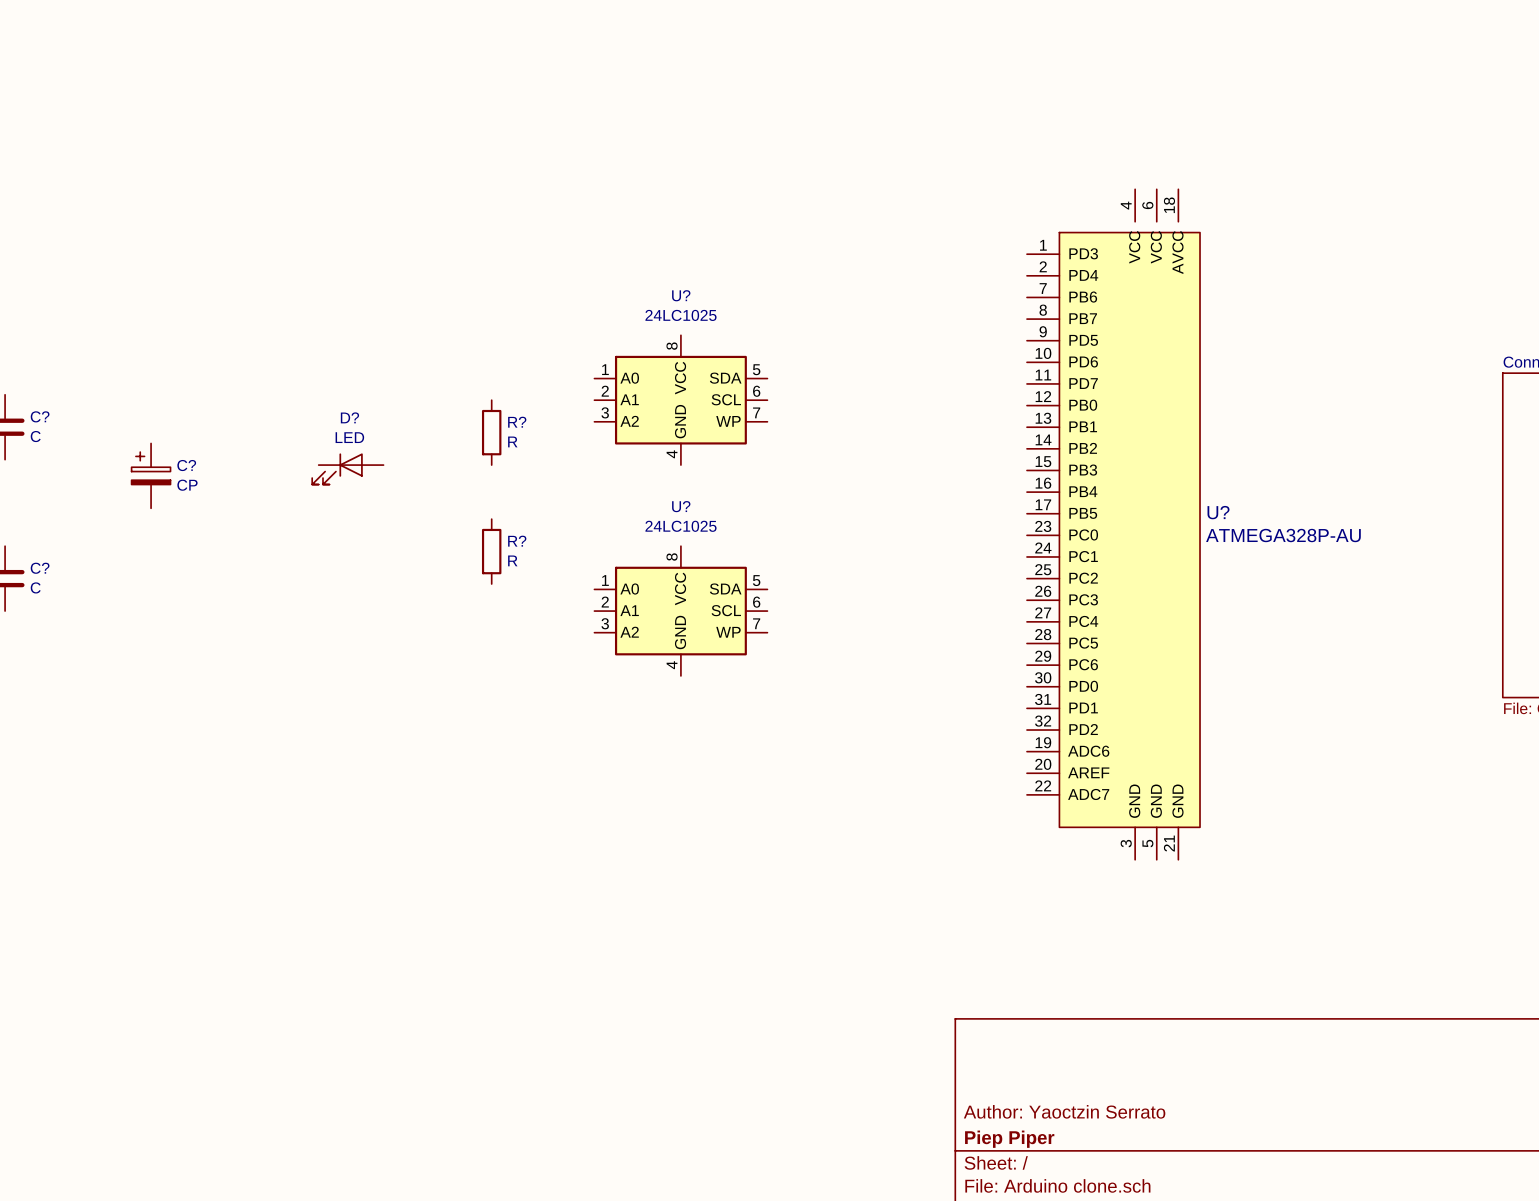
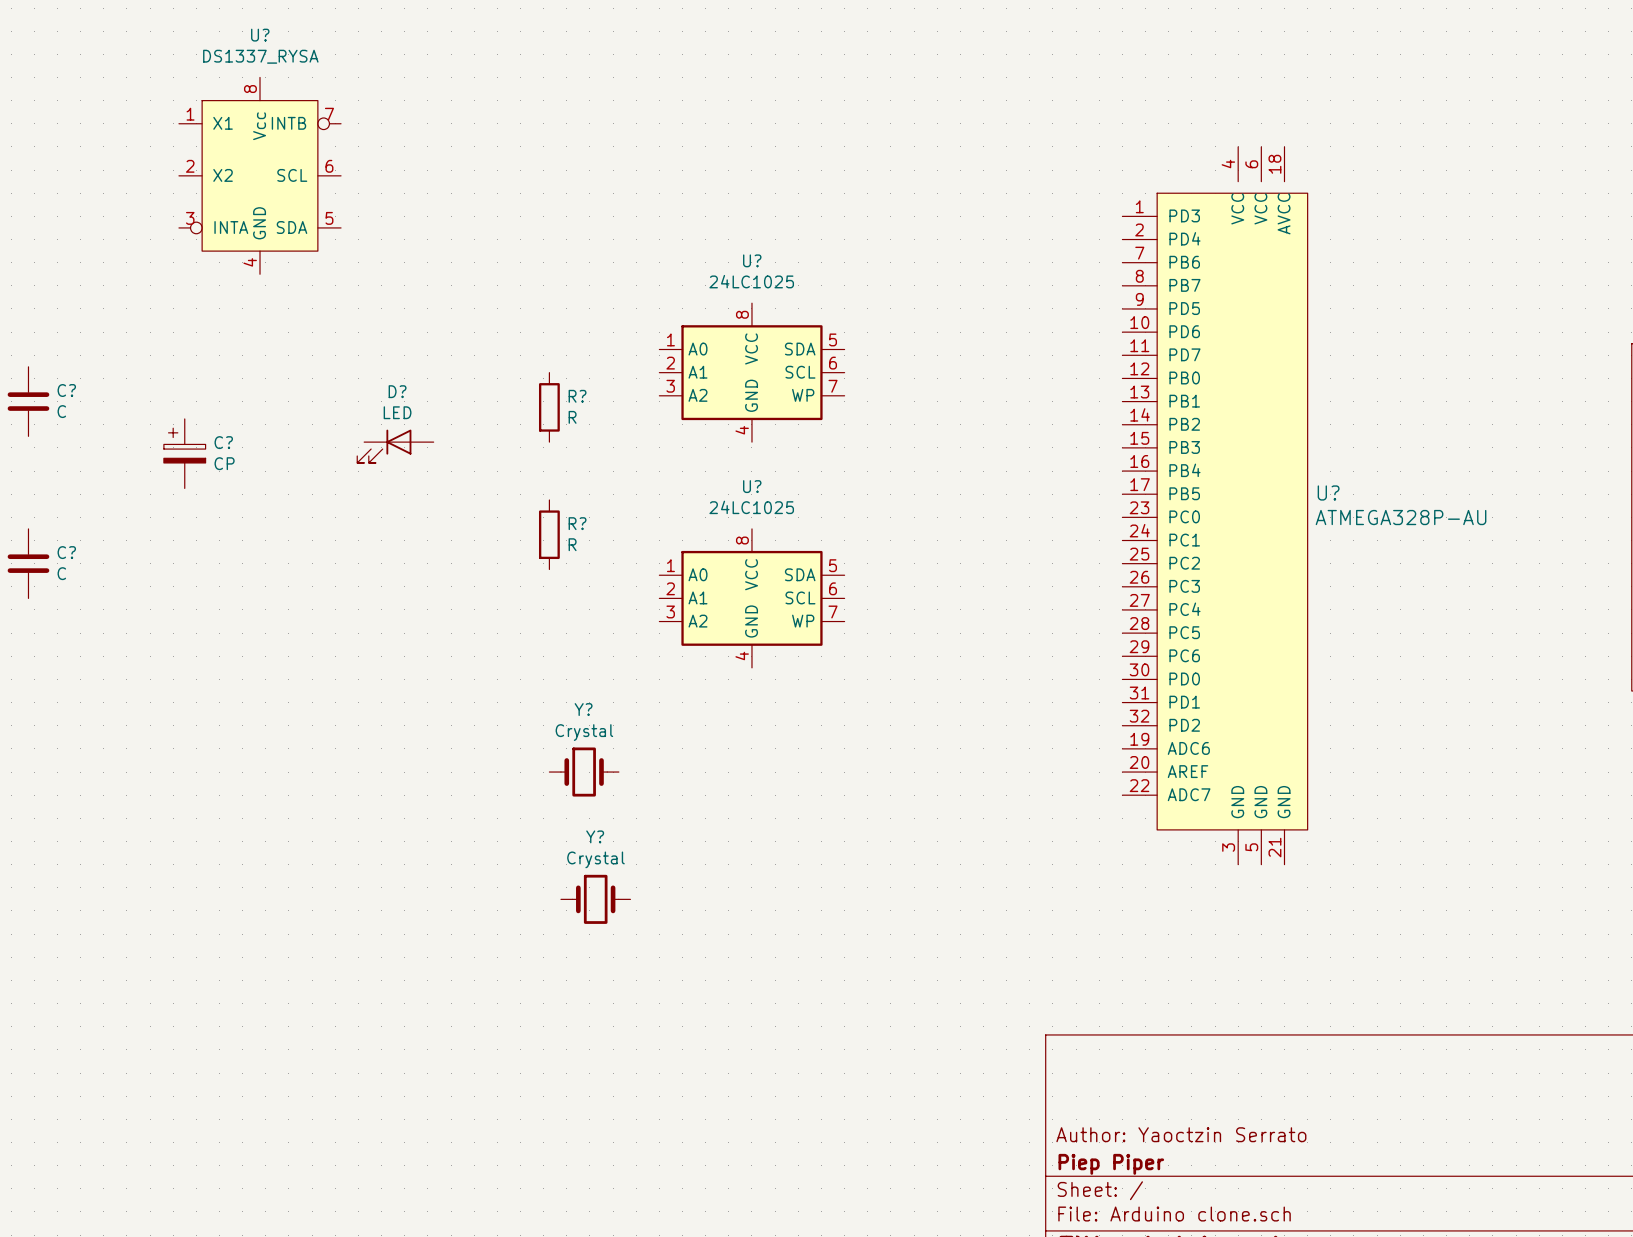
U?: none -> DS1337_RYSA (260, 175)
Y?: none -> Crystal (584, 772)
Y?: none -> Crystal (595, 899)

